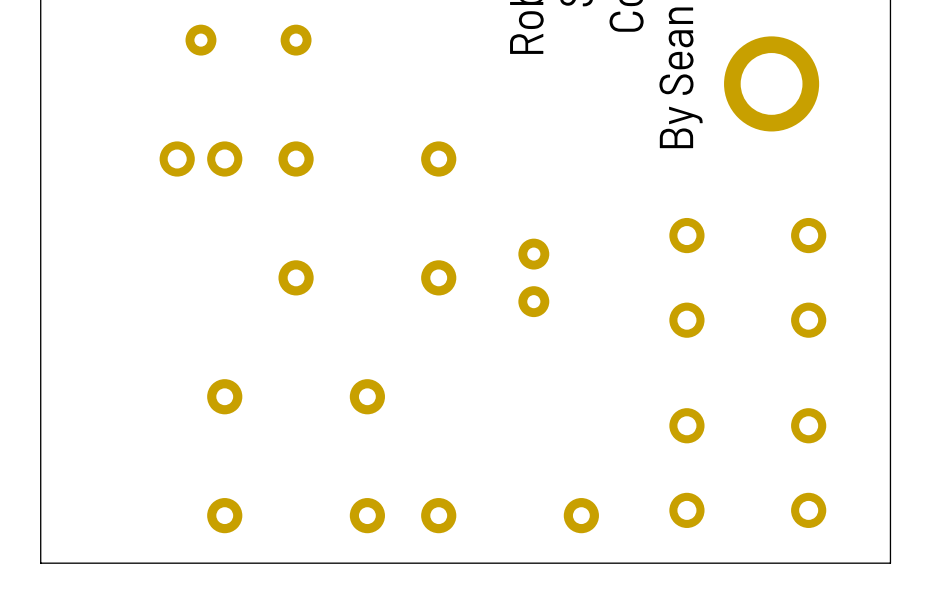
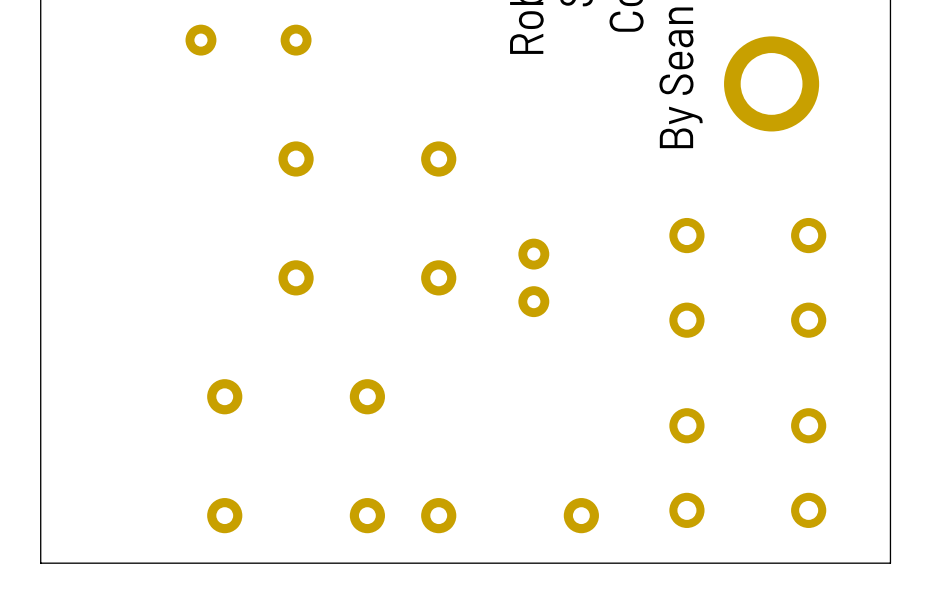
part: (200, 158) -> none

